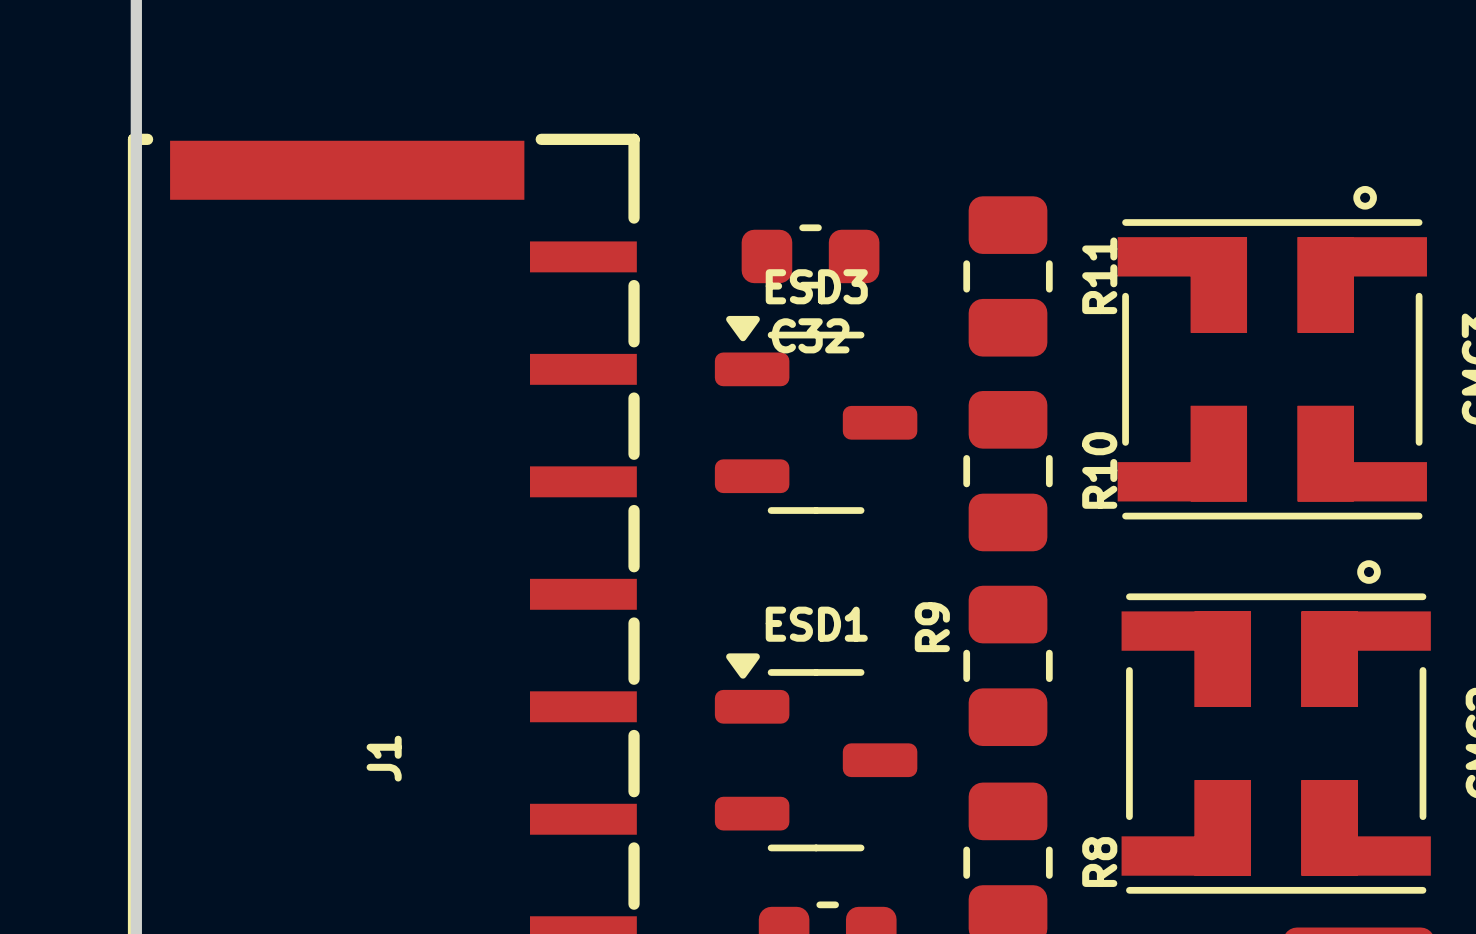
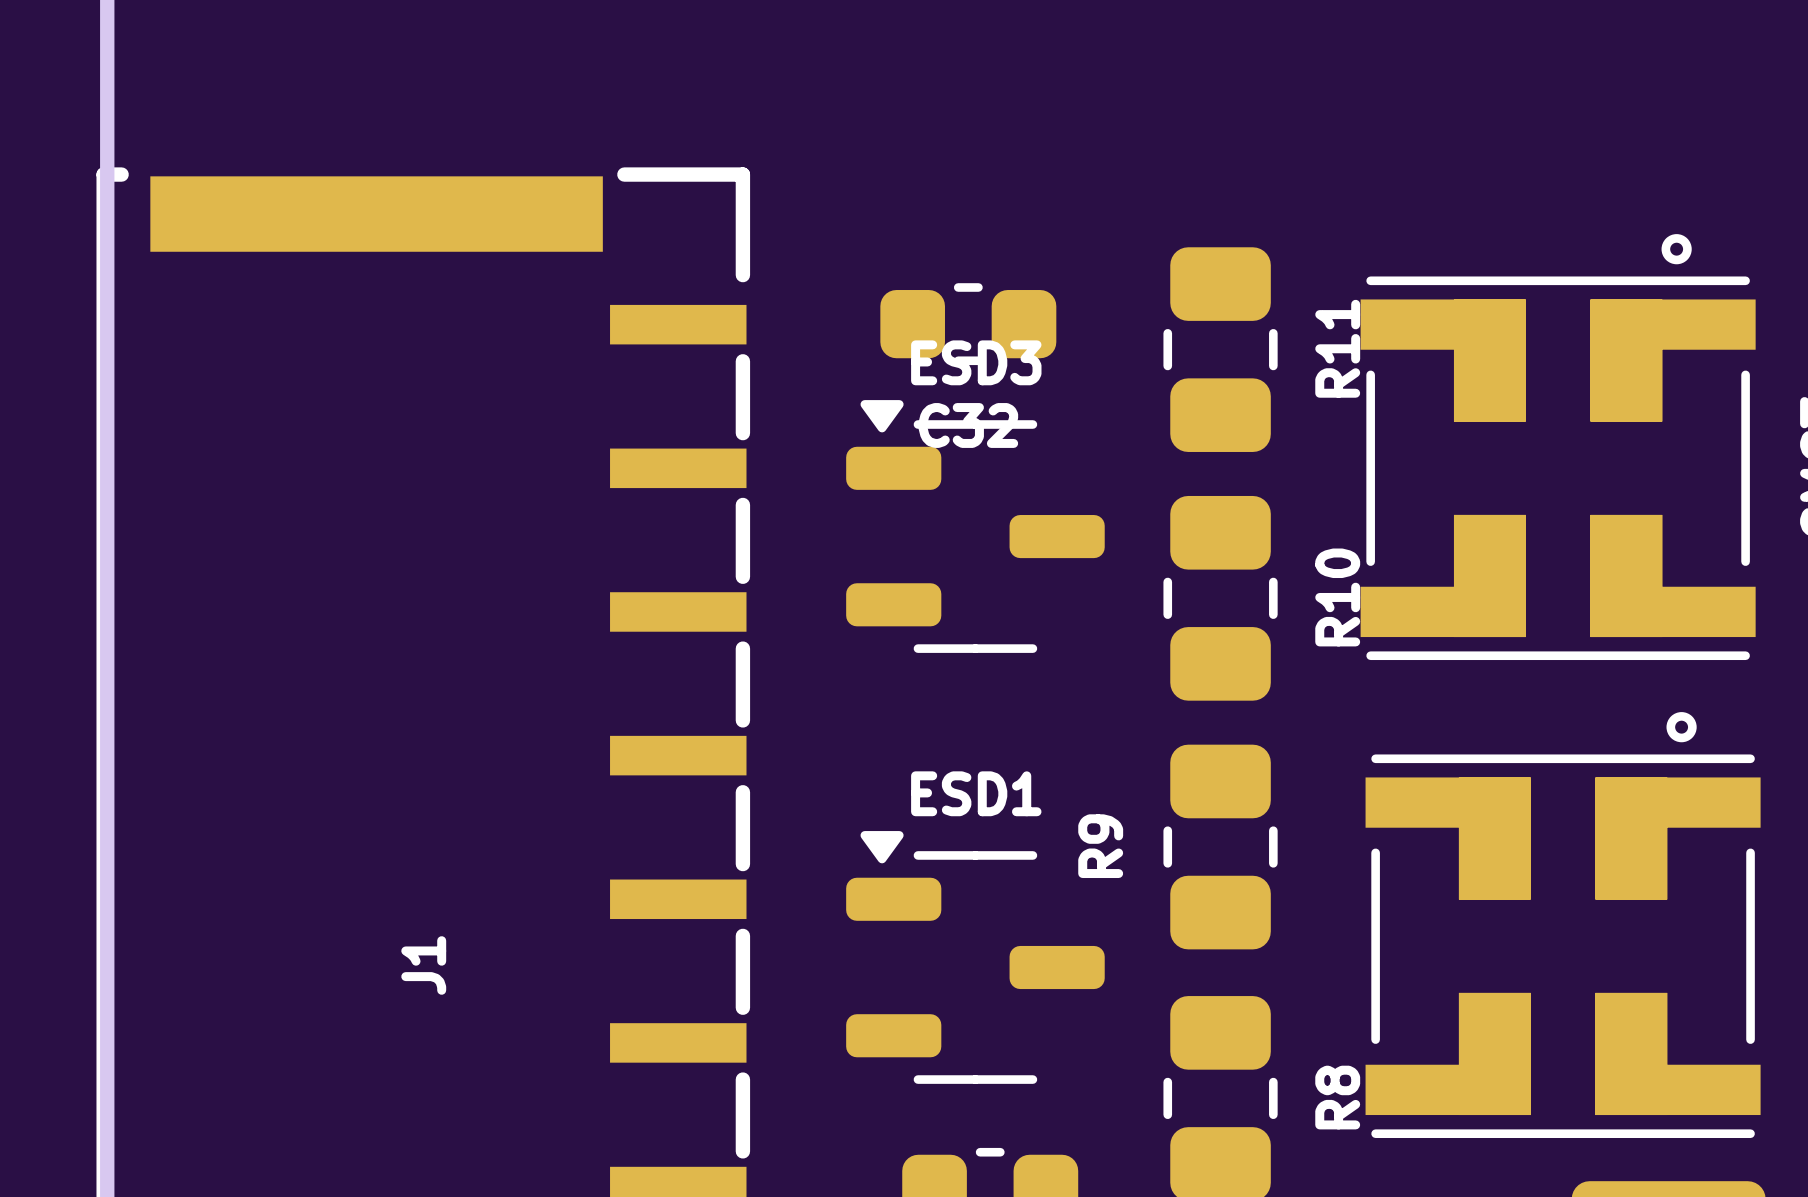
R9 name position: R9 (932, 627) -> R9 (1100, 846)

